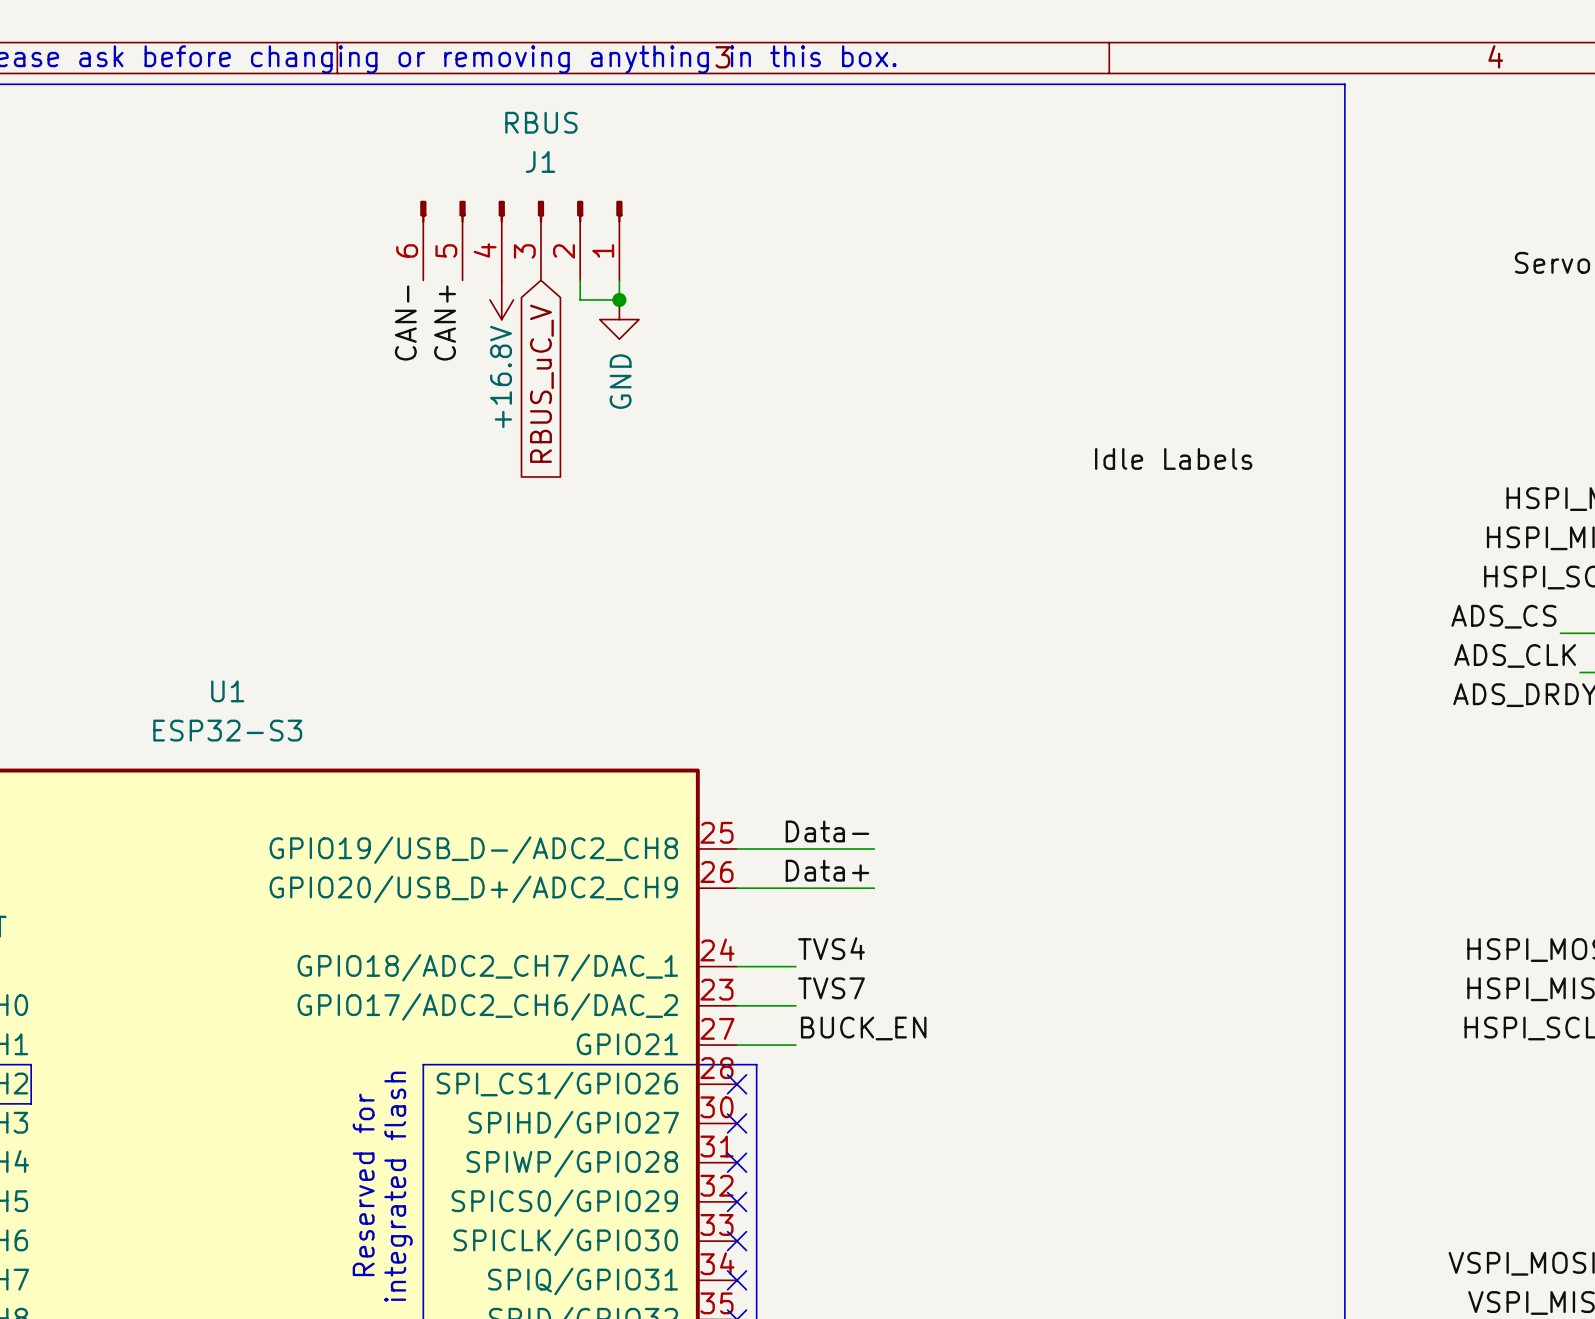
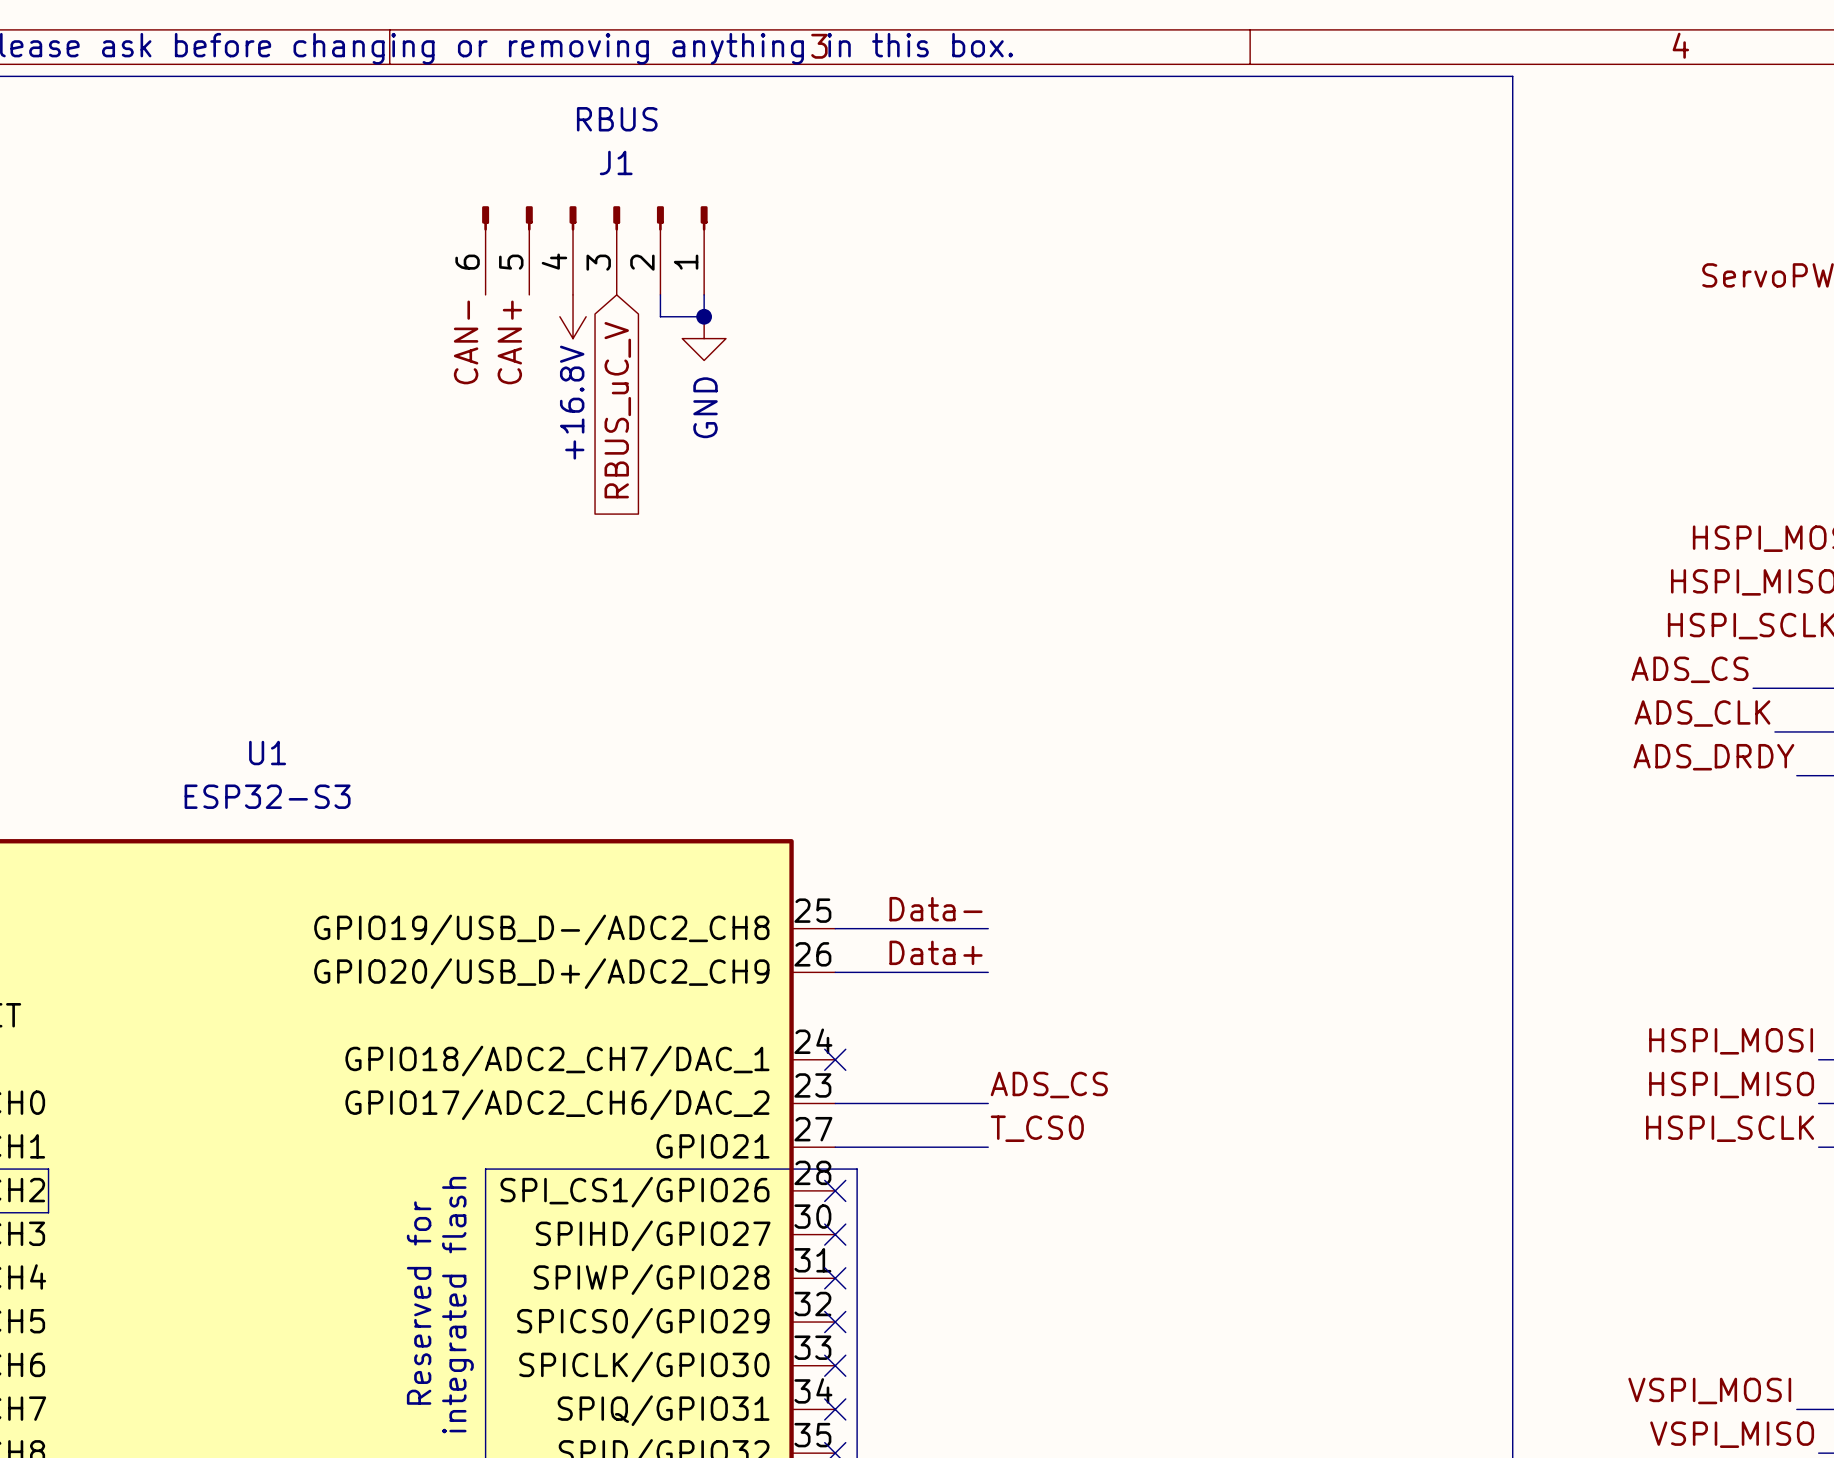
label: Idle Labels (1173, 458) -> none
label: TVS4 (831, 948) -> none
wire: (737, 966) (795, 966) -> none
no-connect mark: none -> (835, 1059)
label: TVS7 (831, 988) -> none
label: none -> ADS_CS (1049, 1085)
wire: none -> (900, 1103) (988, 1103)
label: BUCK_EN (863, 1028) -> none
label: none -> T_CS0 (1037, 1128)
wire: none -> (900, 1147) (988, 1147)

